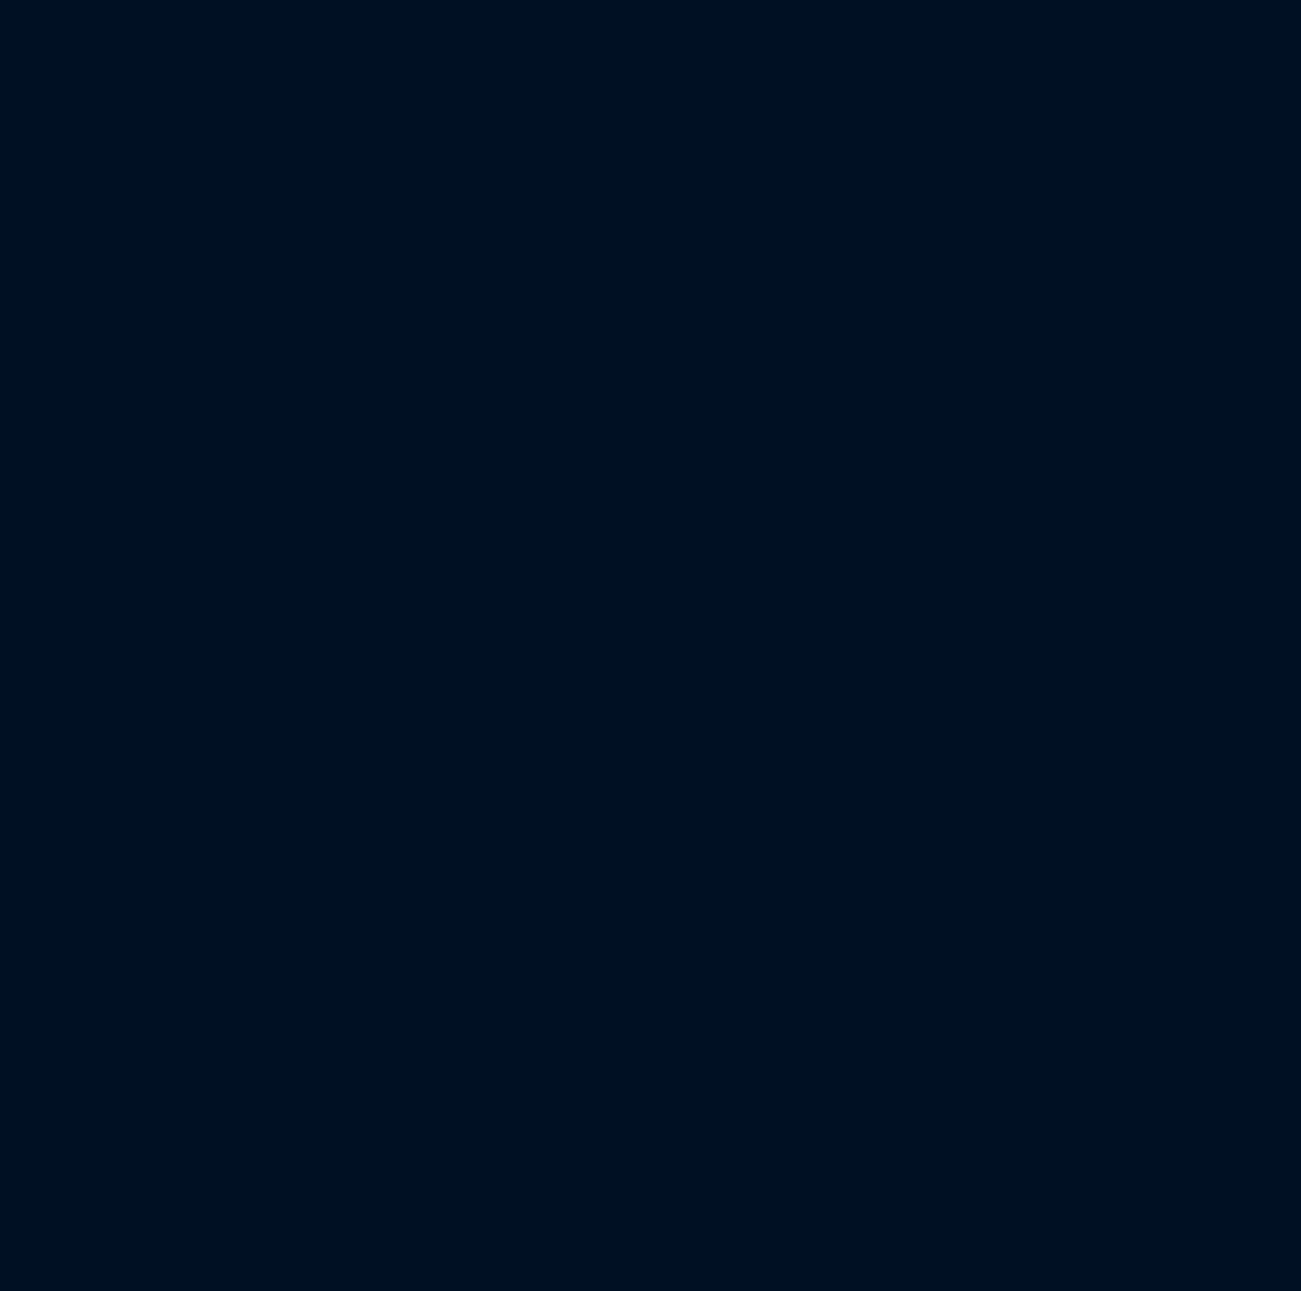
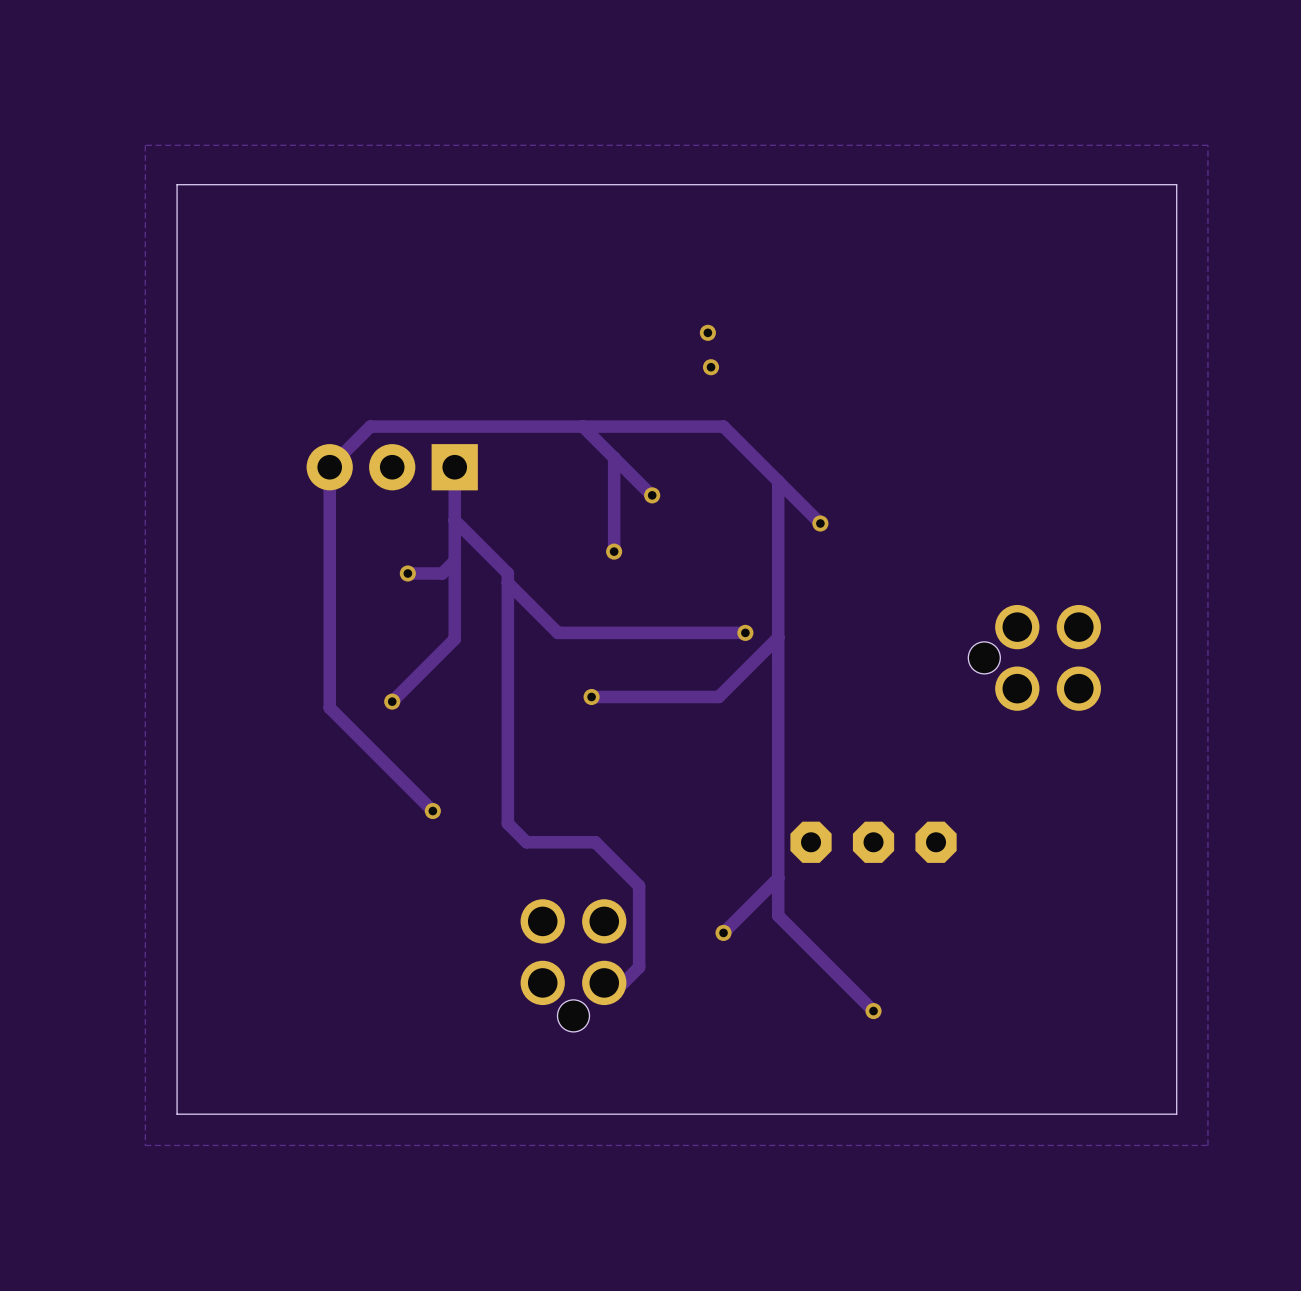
zone outline: none -> (1207, 145) (145, 145) (145, 1145) (1207, 1145) (1207, 145)
board edge: none -> (1176, 184) (177, 184) (177, 1114) (1176, 1114) (1176, 184)
via: none -> (707, 332)
via: none -> (711, 367)
track: none -> (582, 426) (652, 495)
track: none -> (614, 457) (614, 551)
part: none -> (392, 467)
track: none -> (454, 467) (454, 639) (392, 701)
track: none -> (778, 481) (778, 915) (873, 1011)
via: none -> (652, 495)
track: none -> (454, 520) (507, 573) (507, 823) (526, 842) (595, 842) (639, 886) (639, 967) (623, 982) (604, 982)
track: none -> (820, 523) (723, 426) (370, 426) (329, 467) (329, 707) (432, 811)
via: none -> (820, 523)
via: none -> (614, 551)
track: none -> (454, 560) (442, 573) (407, 573)
via: none -> (407, 573)
track: none -> (507, 582) (557, 632) (745, 632)
via: none -> (745, 632)
track: none -> (778, 637) (718, 696) (591, 696)
part: none -> (1034, 657)
via: none -> (591, 696)
via: none -> (392, 701)
via: none -> (432, 811)
part: none -> (873, 842)
track: none -> (778, 878) (723, 932)
via: none -> (723, 932)
part: none -> (573, 965)
via: none -> (873, 1011)

